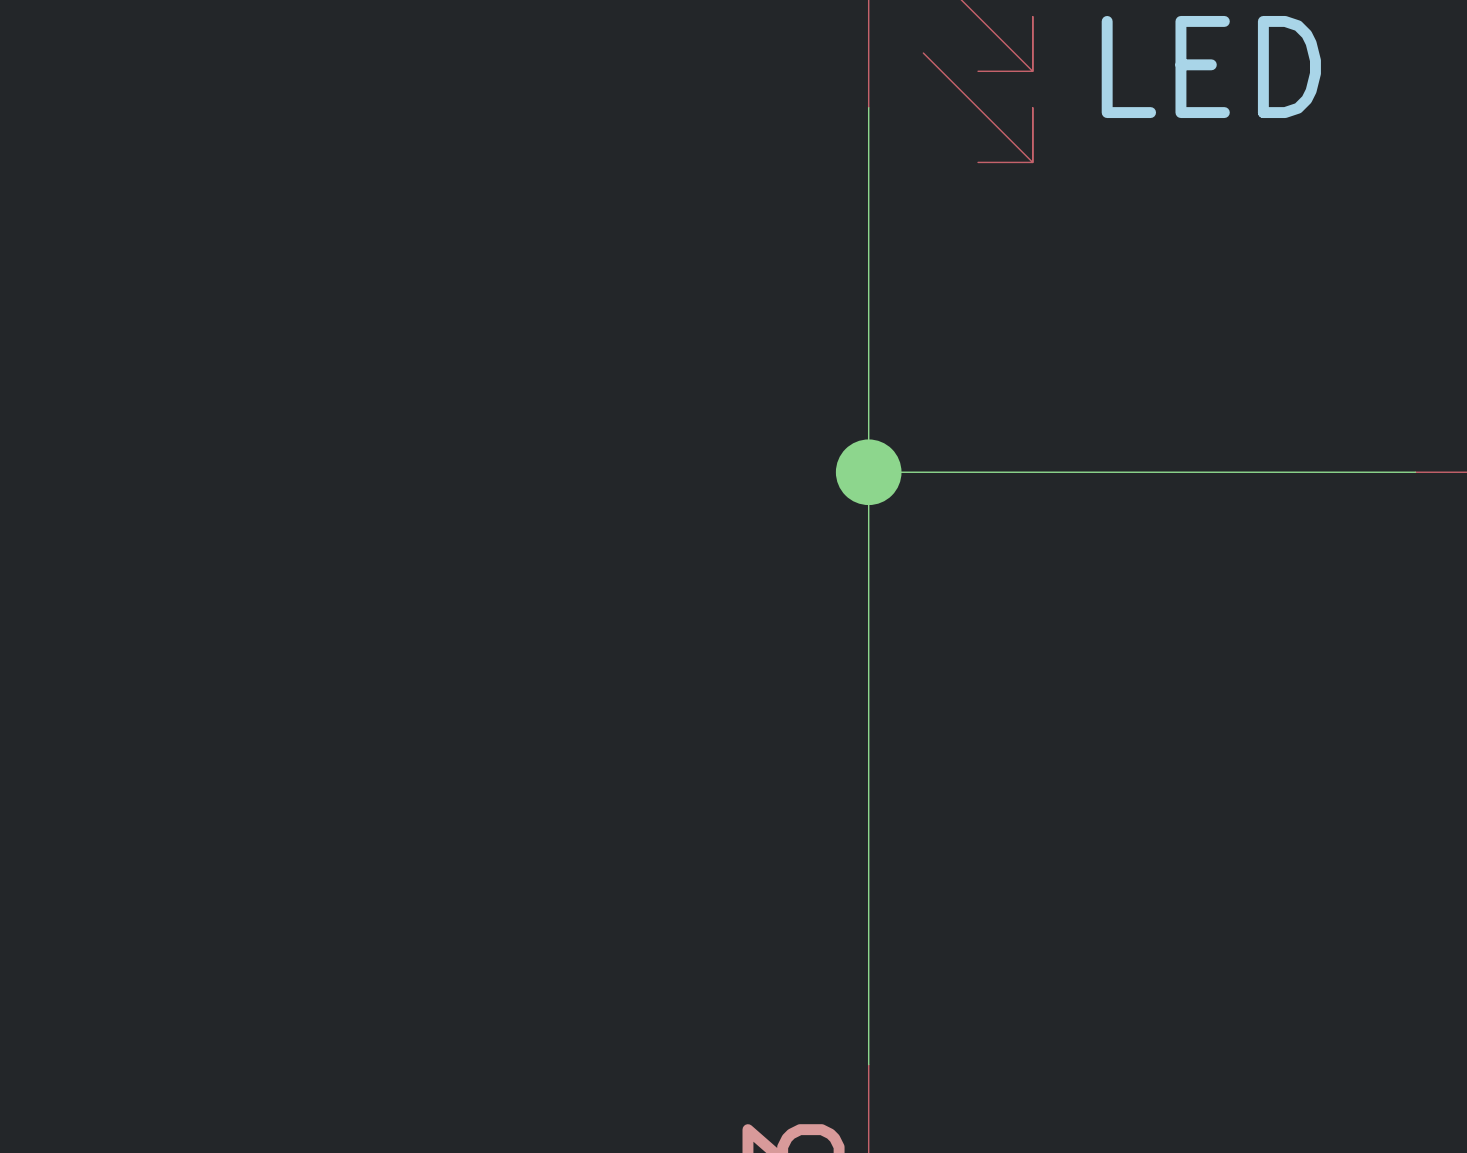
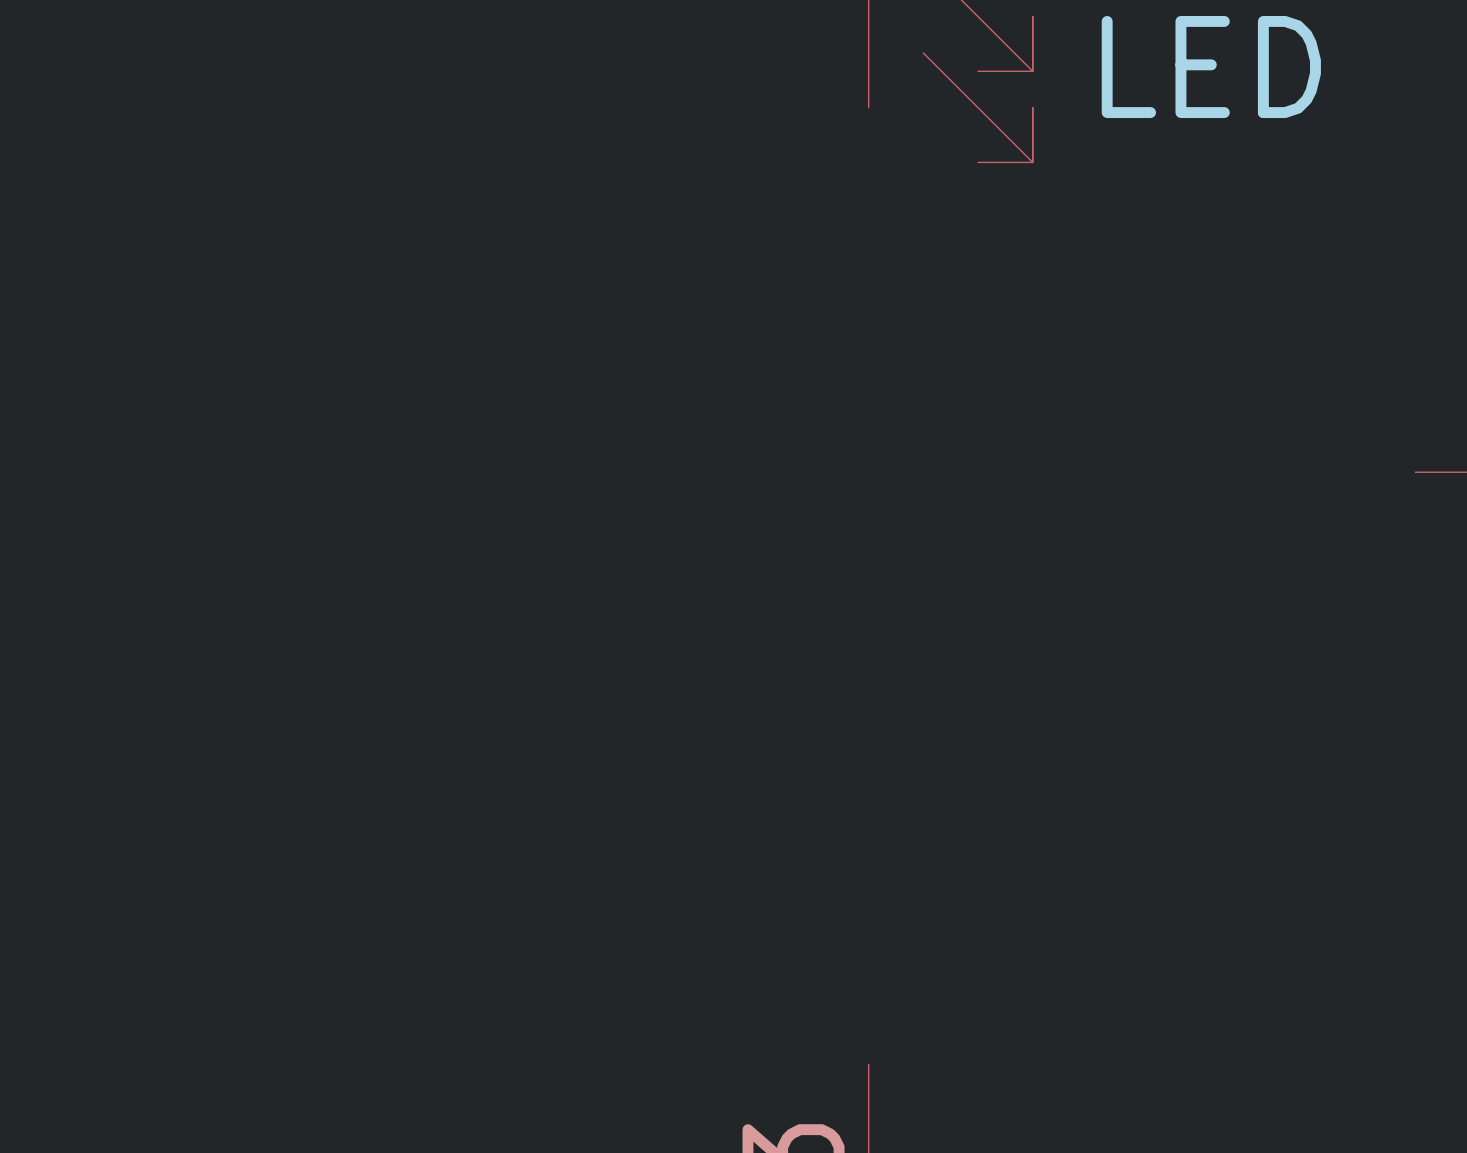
wire: (868, 107) (868, 1064) -> none
wire: (868, 472) (1415, 472) -> none
junction: (868, 472) -> none

